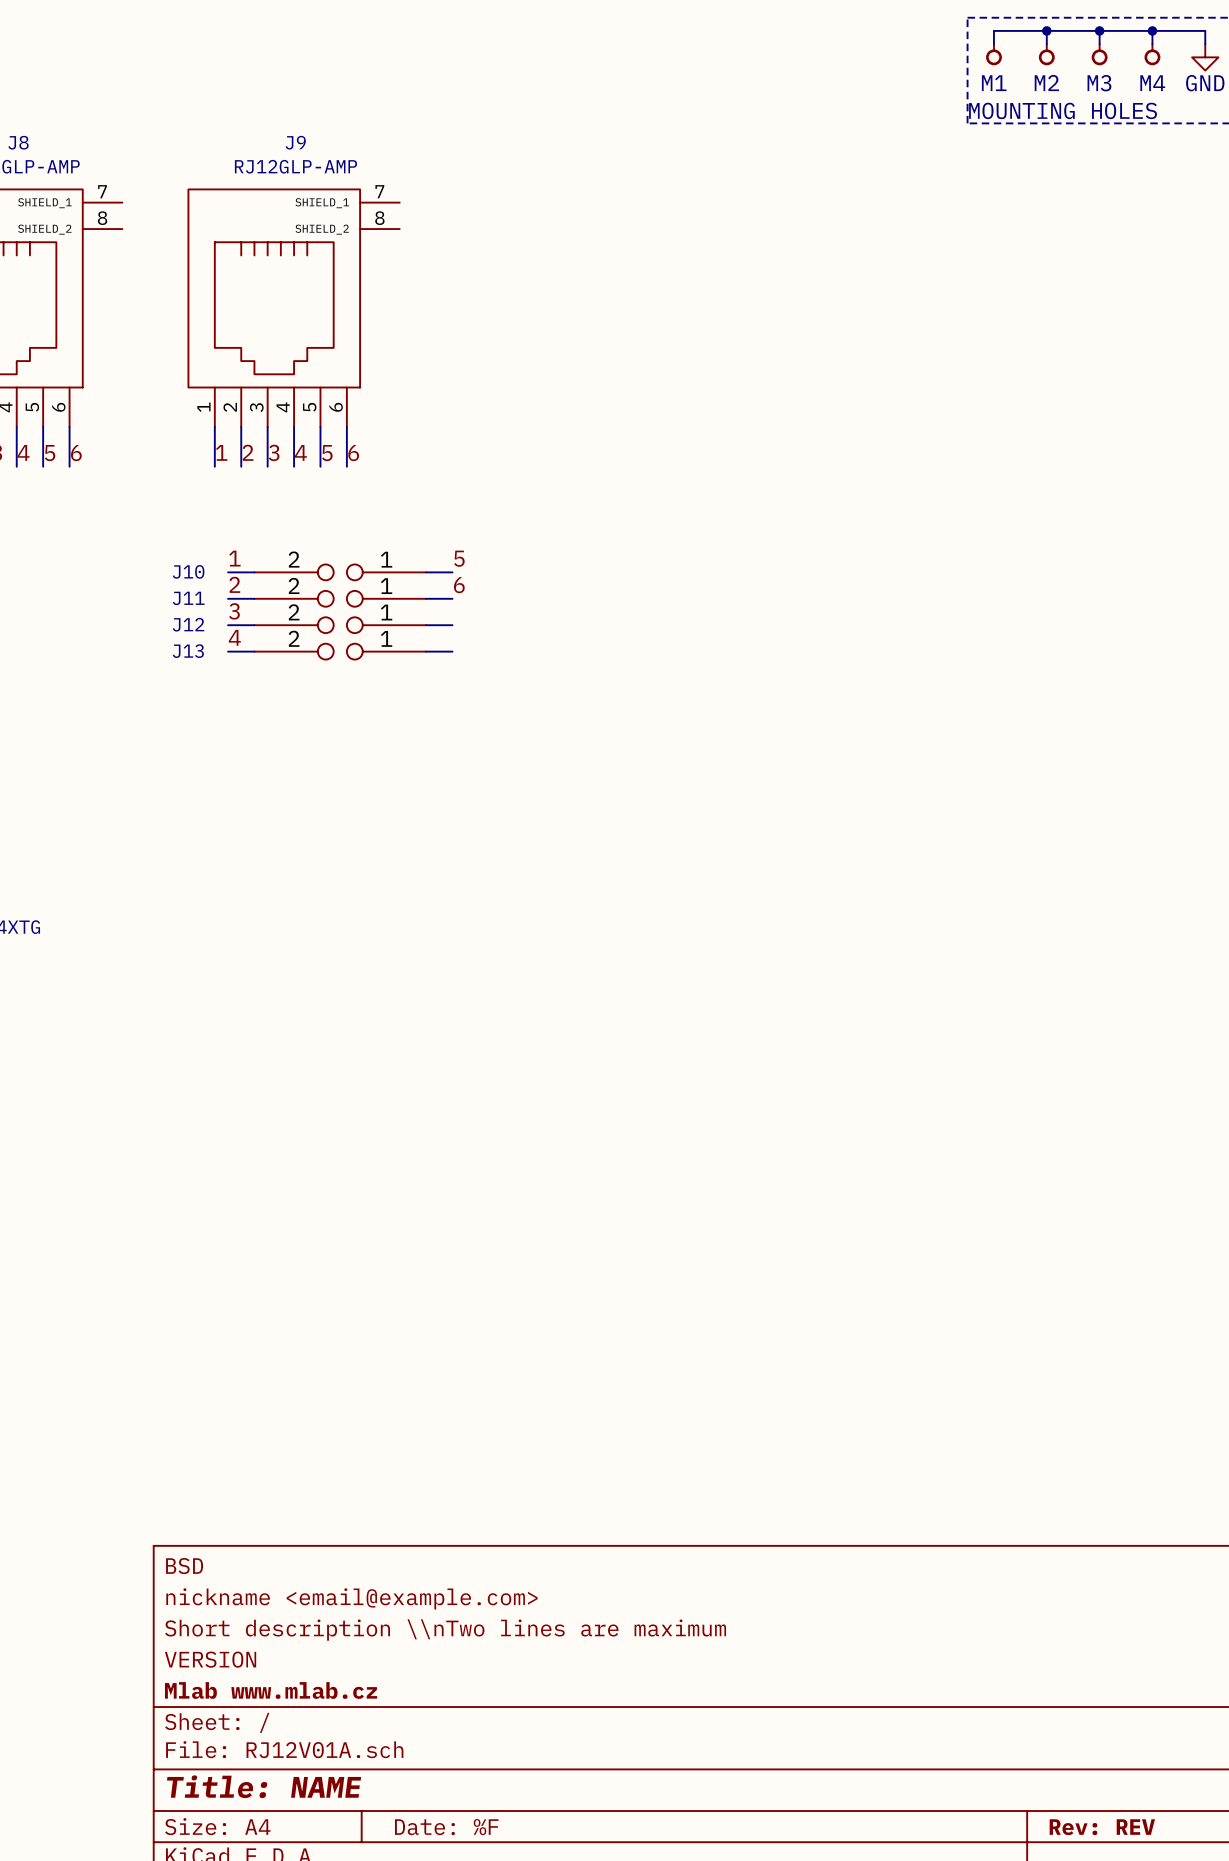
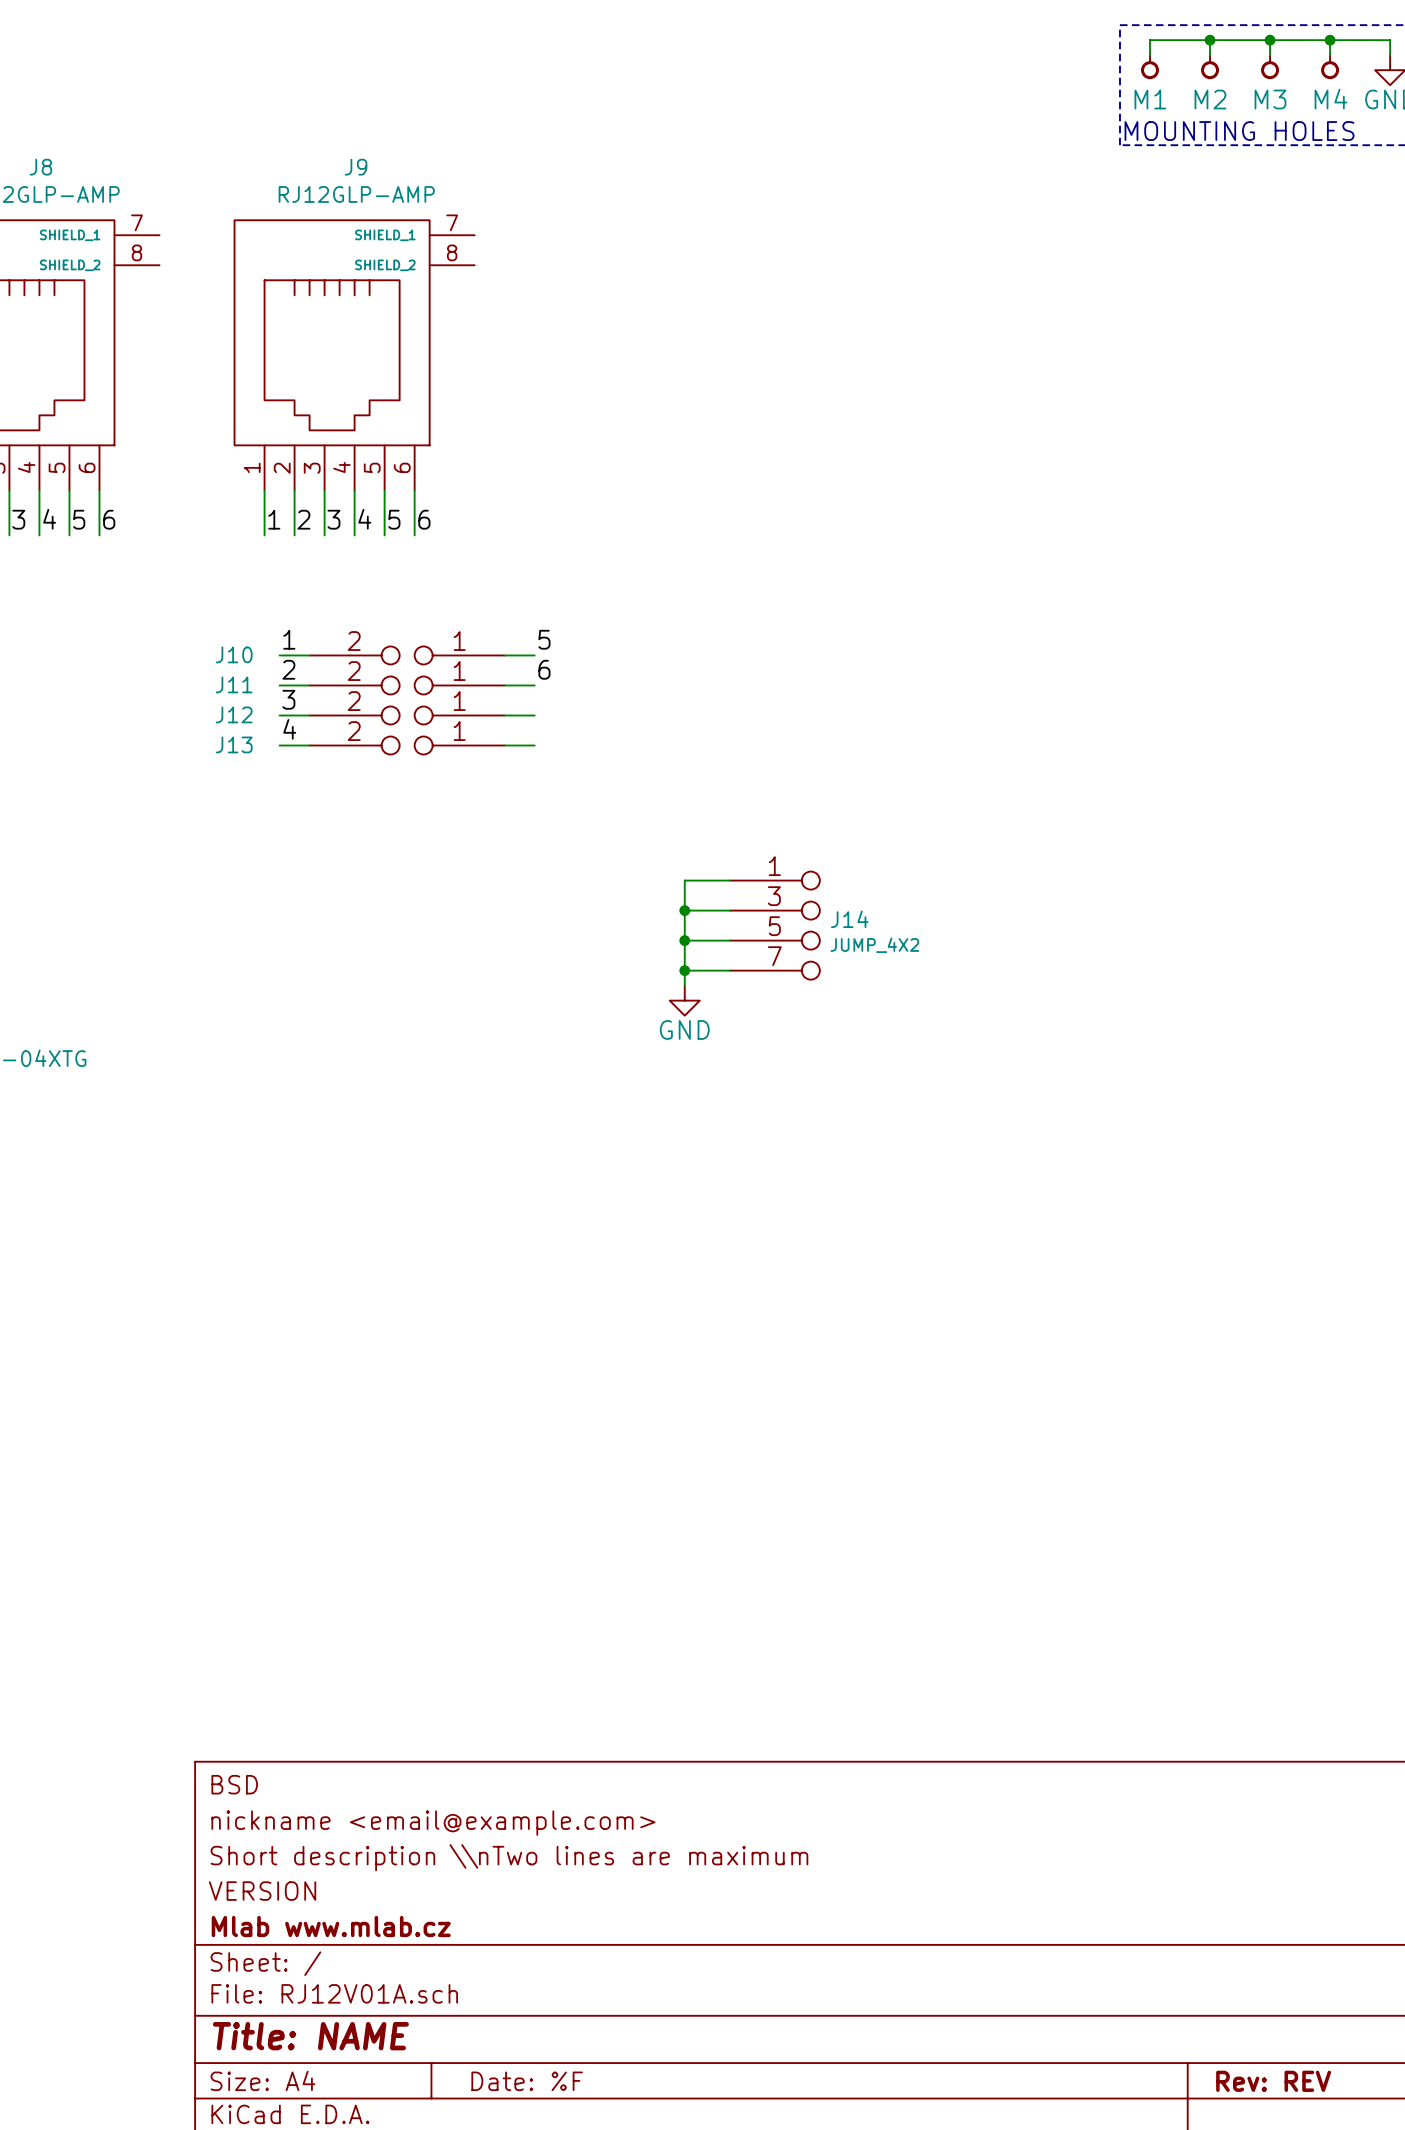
wire: none -> (729, 880) (684, 880) (684, 985)
wire: none -> (684, 910) (729, 910)
junction: none -> (684, 910)
J14: none -> JUMP_4X2 (774, 925)
wire: none -> (684, 940) (729, 940)
junction: none -> (684, 940)
wire: none -> (684, 970) (729, 970)
junction: none -> (684, 970)
power symbol: none -> GND (684, 1000)

